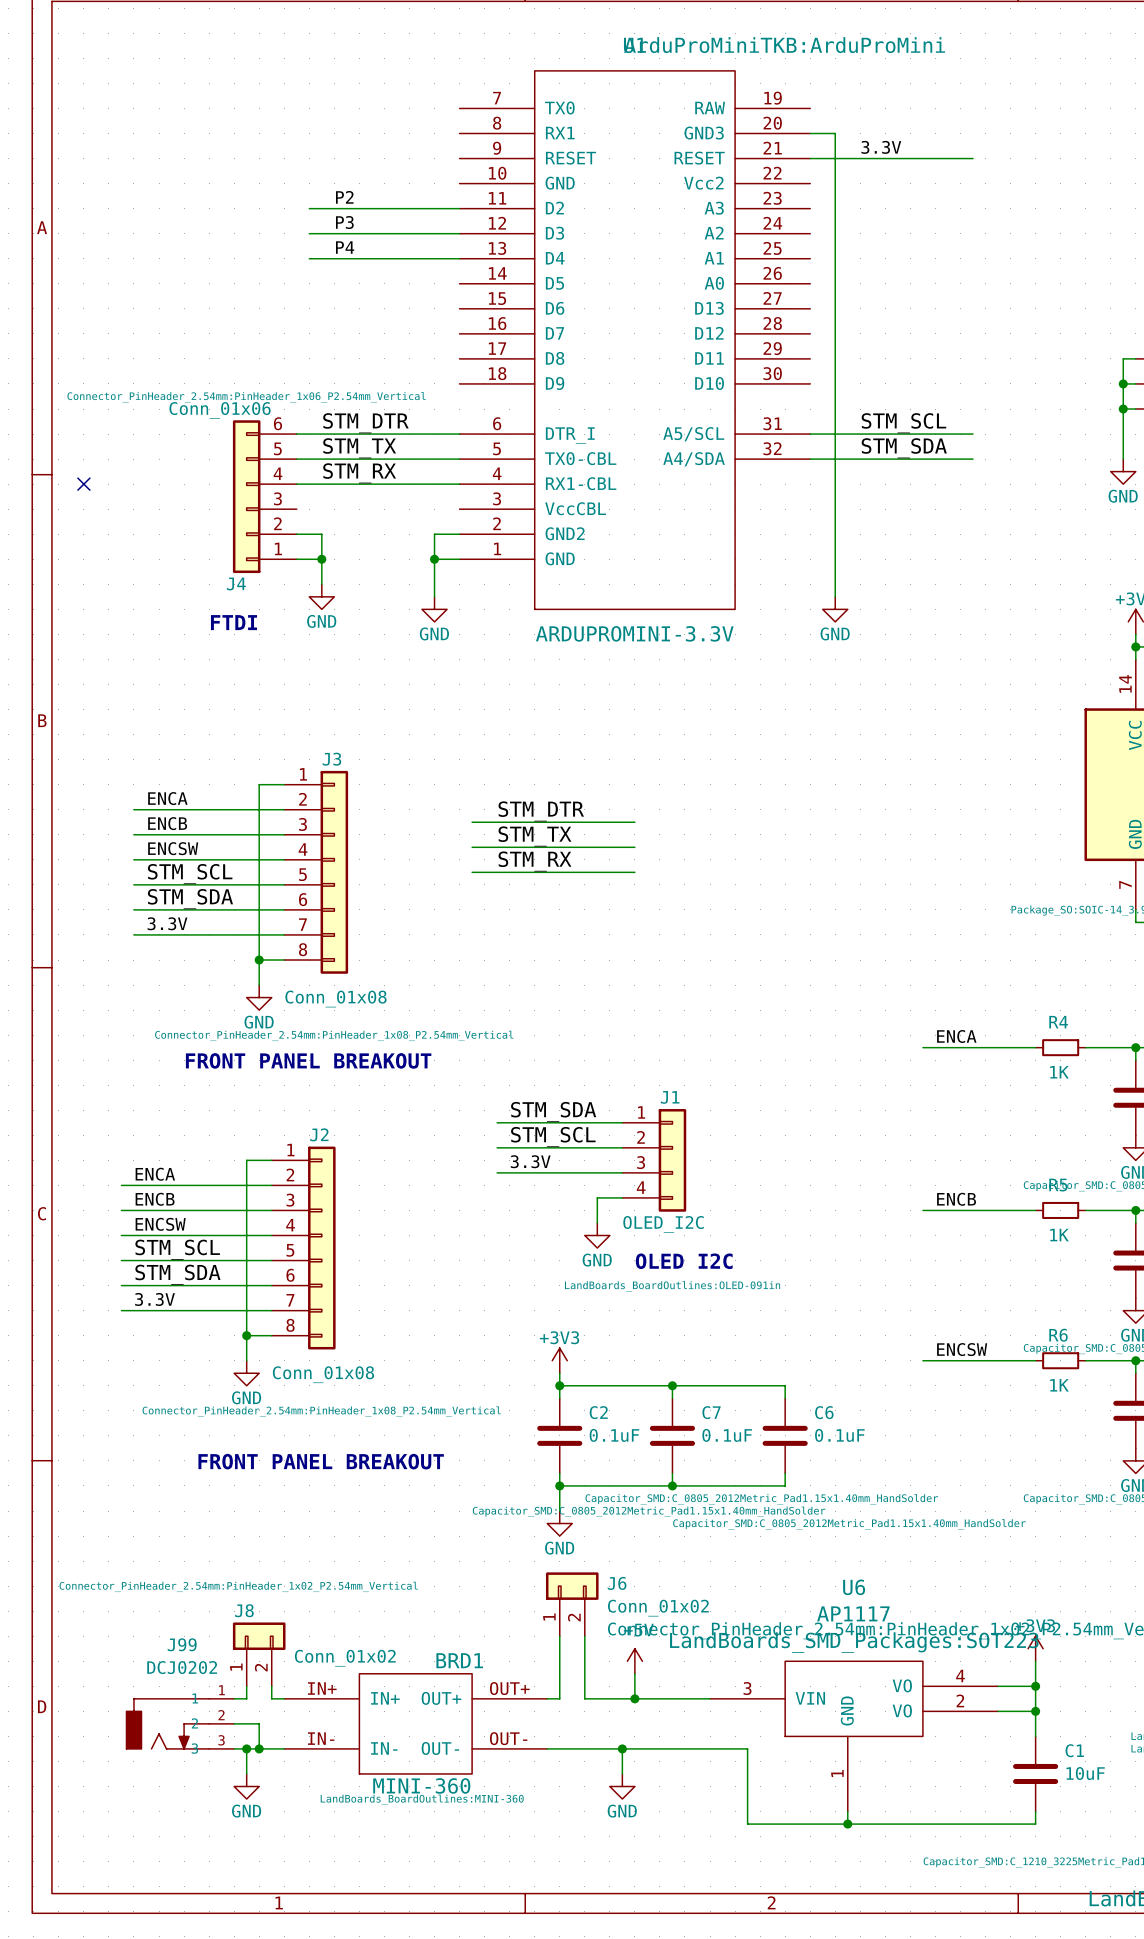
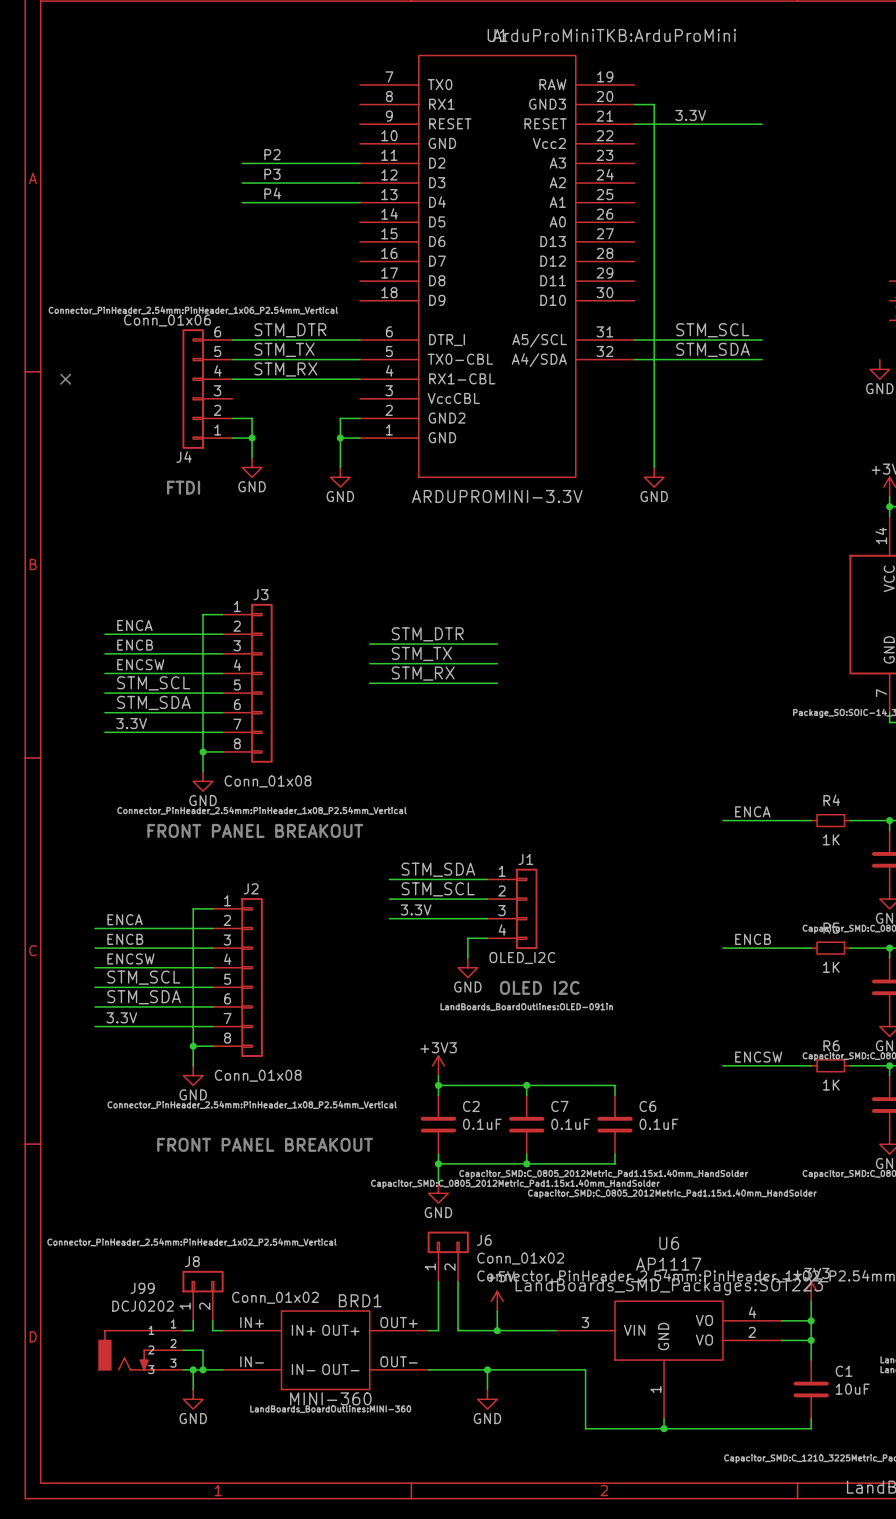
wire: (1135, 358) (1123, 358) (1123, 459) -> none
wire: (1123, 383) (1135, 383) -> none
junction: (1123, 383) -> none
wire: (1123, 409) (1135, 409) -> none
junction: (1123, 409) -> none

